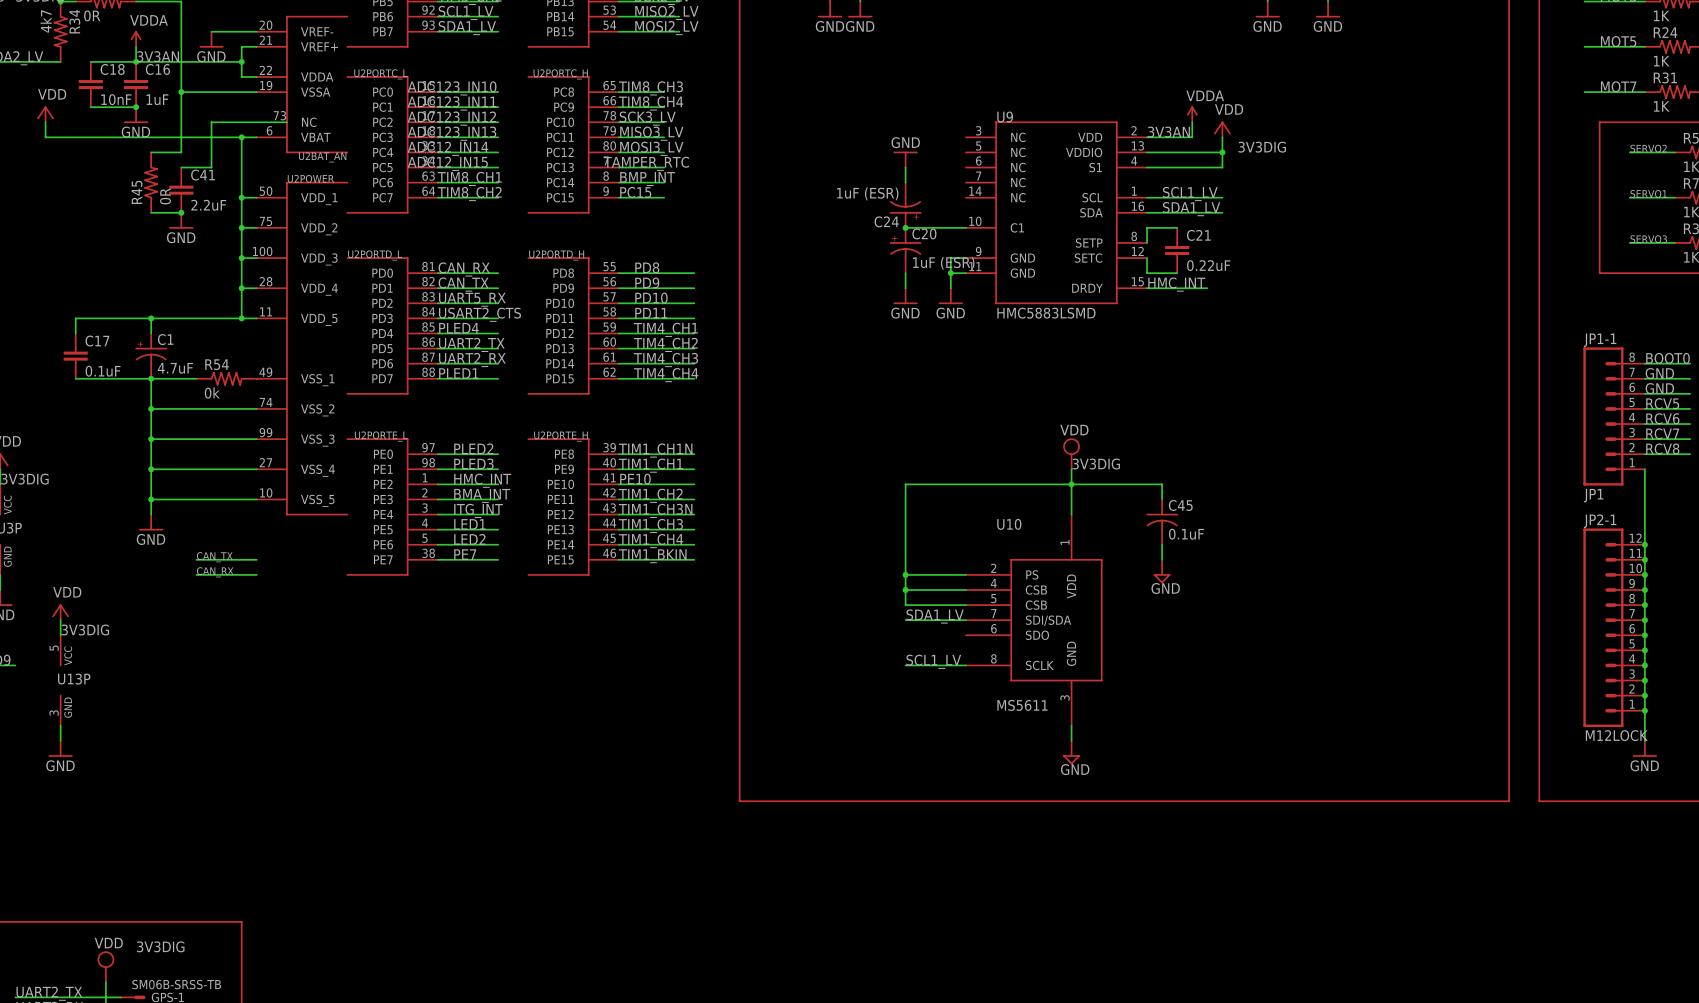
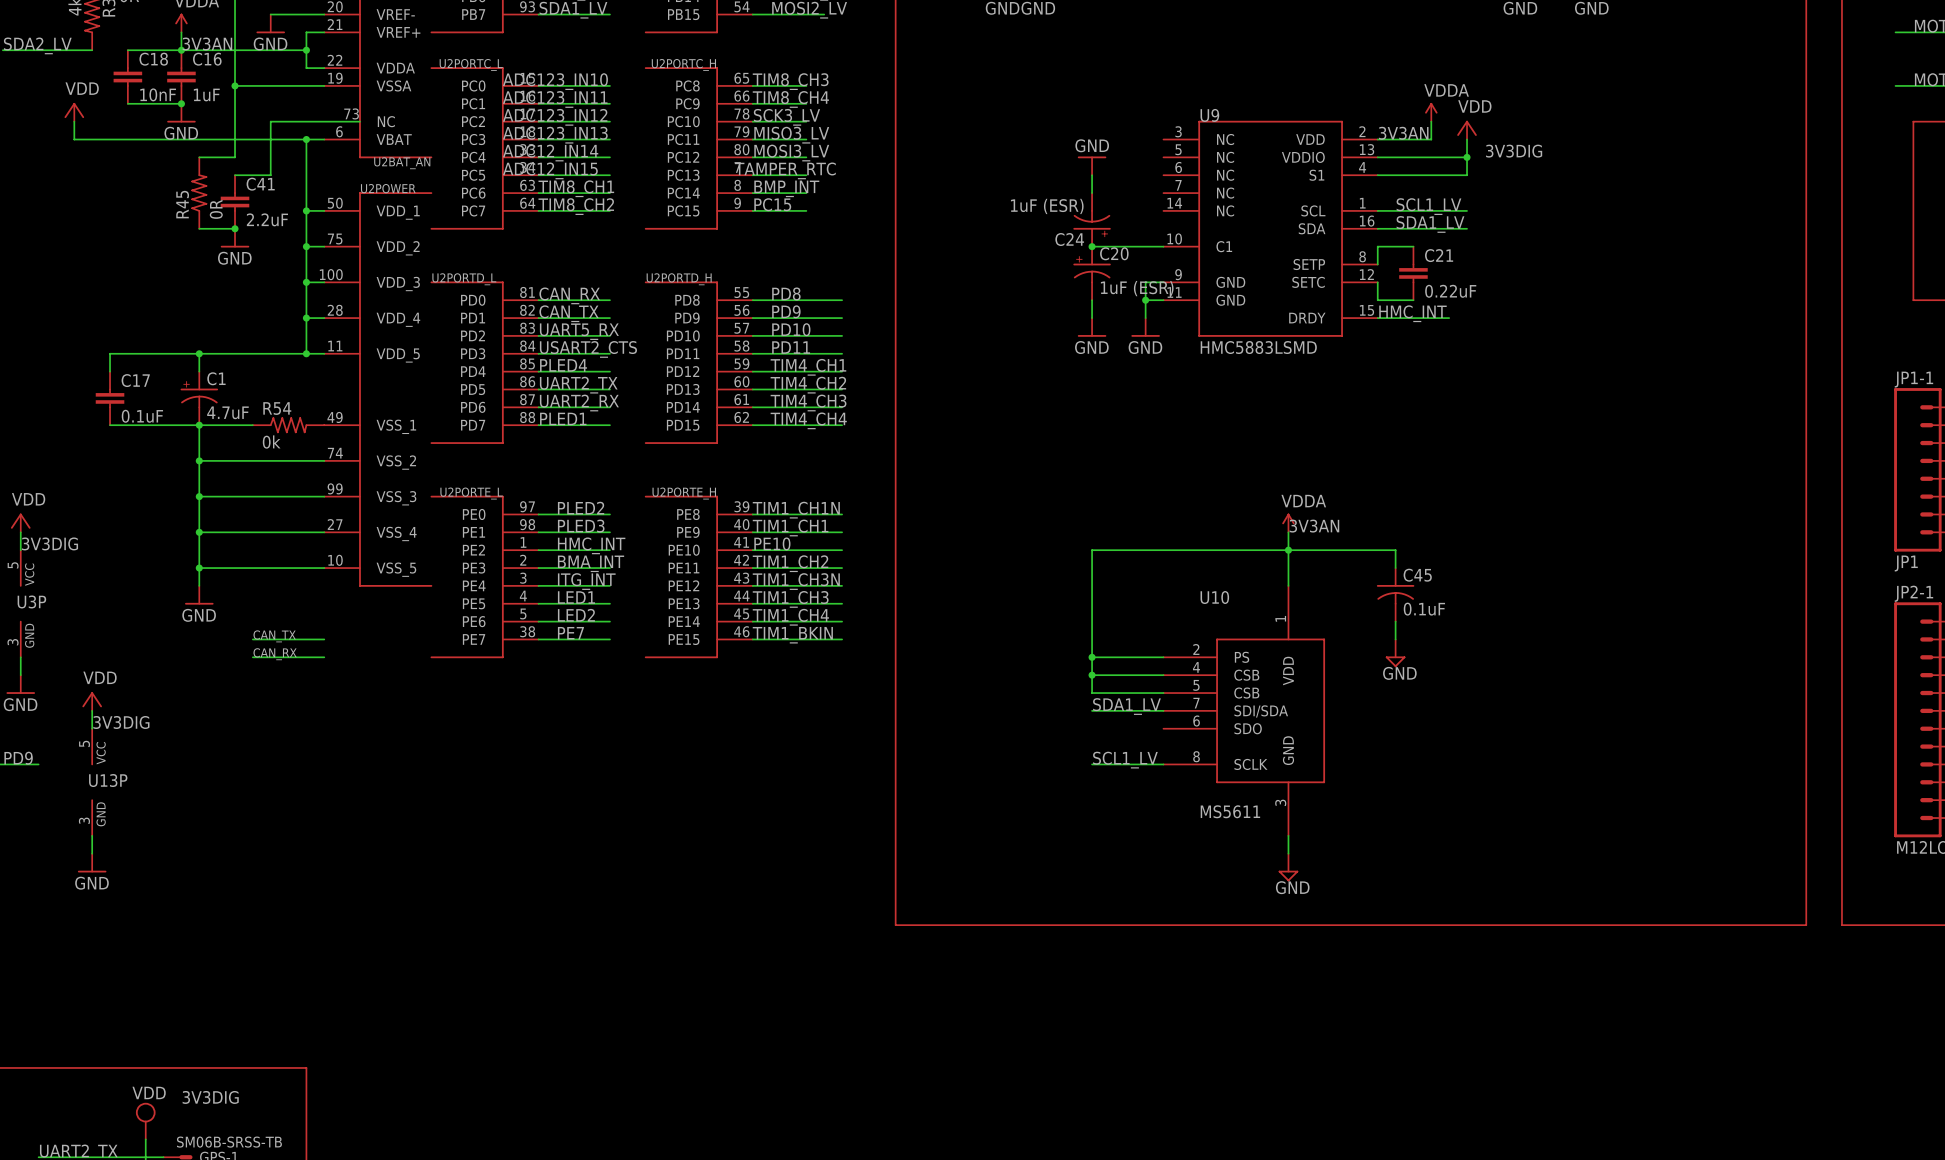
power symbol: VDD (1071, 453) -> none
power symbol: none -> VDDA (1288, 522)
label: 3V3DIG (1096, 464) -> 3V3AN (1314, 526)

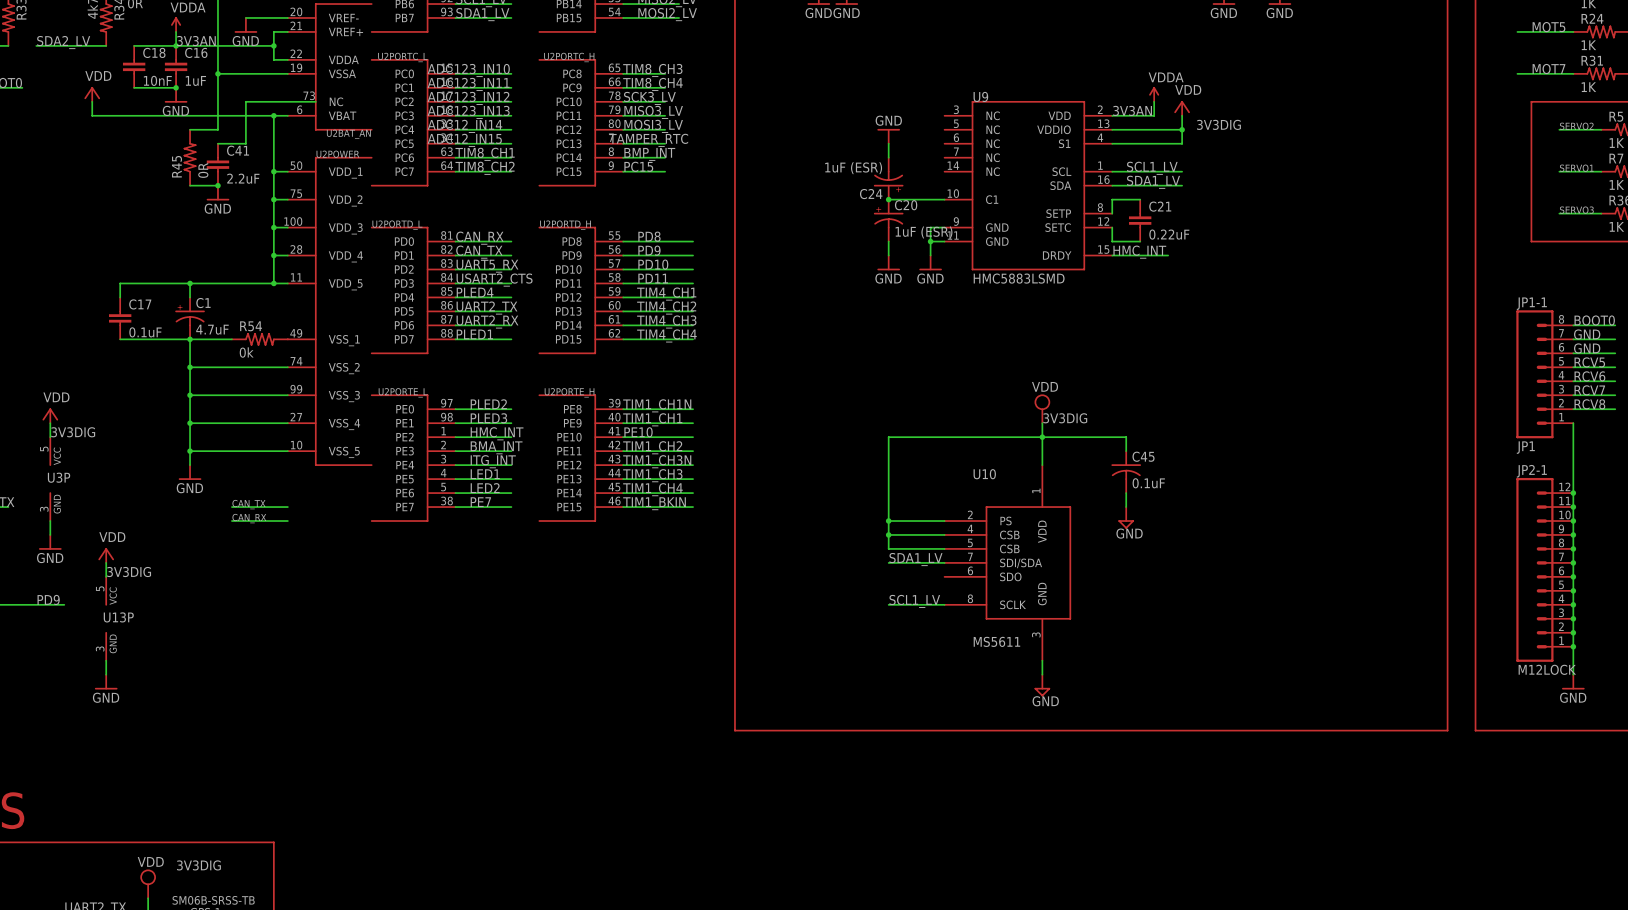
power symbol: none -> VDD (1042, 408)
power symbol: VDDA (1288, 522) -> none
label: 3V3AN (1314, 526) -> 3V3DIG (1065, 418)

